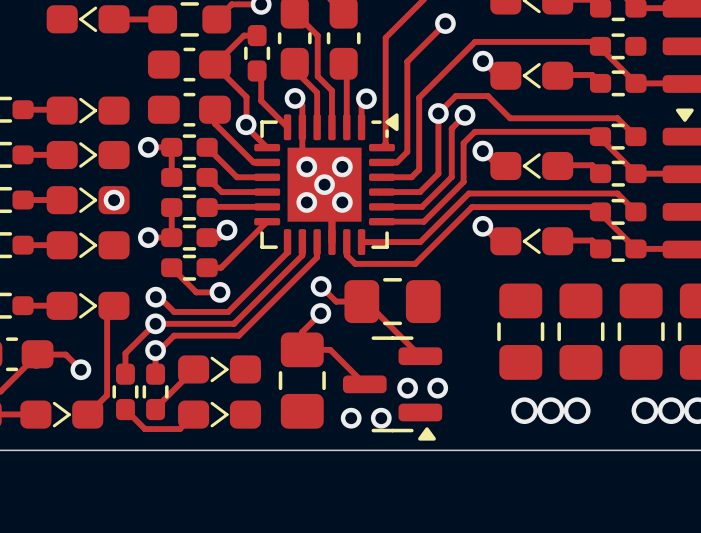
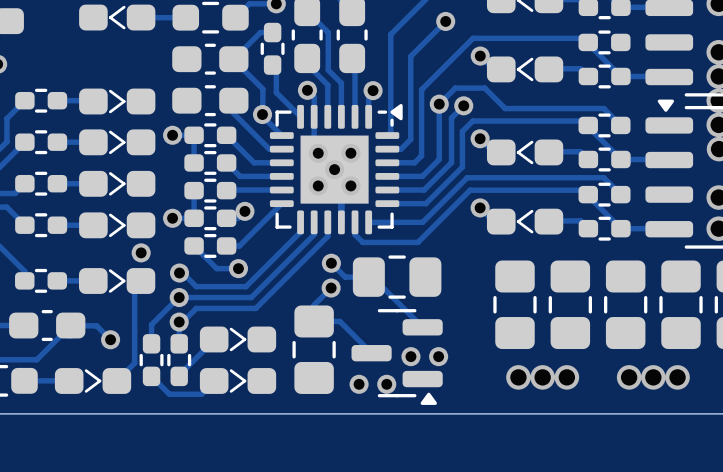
via position: (114, 200) -> (141, 252)

